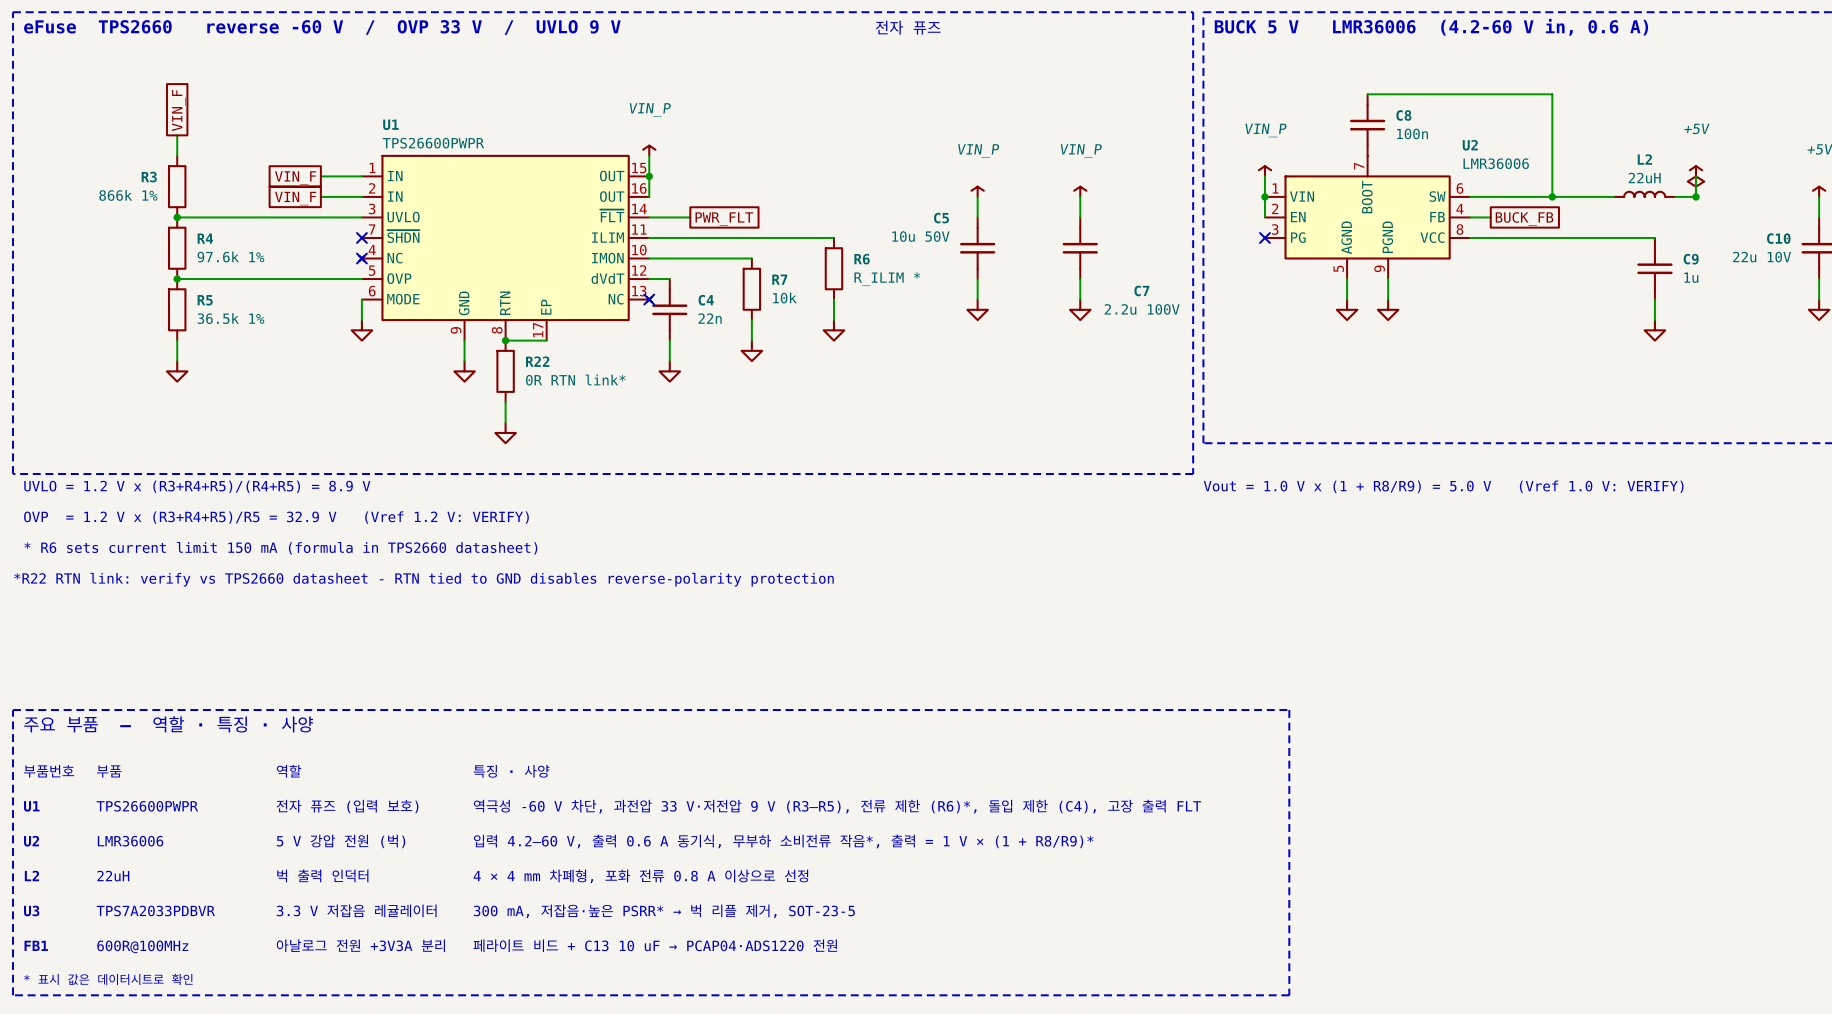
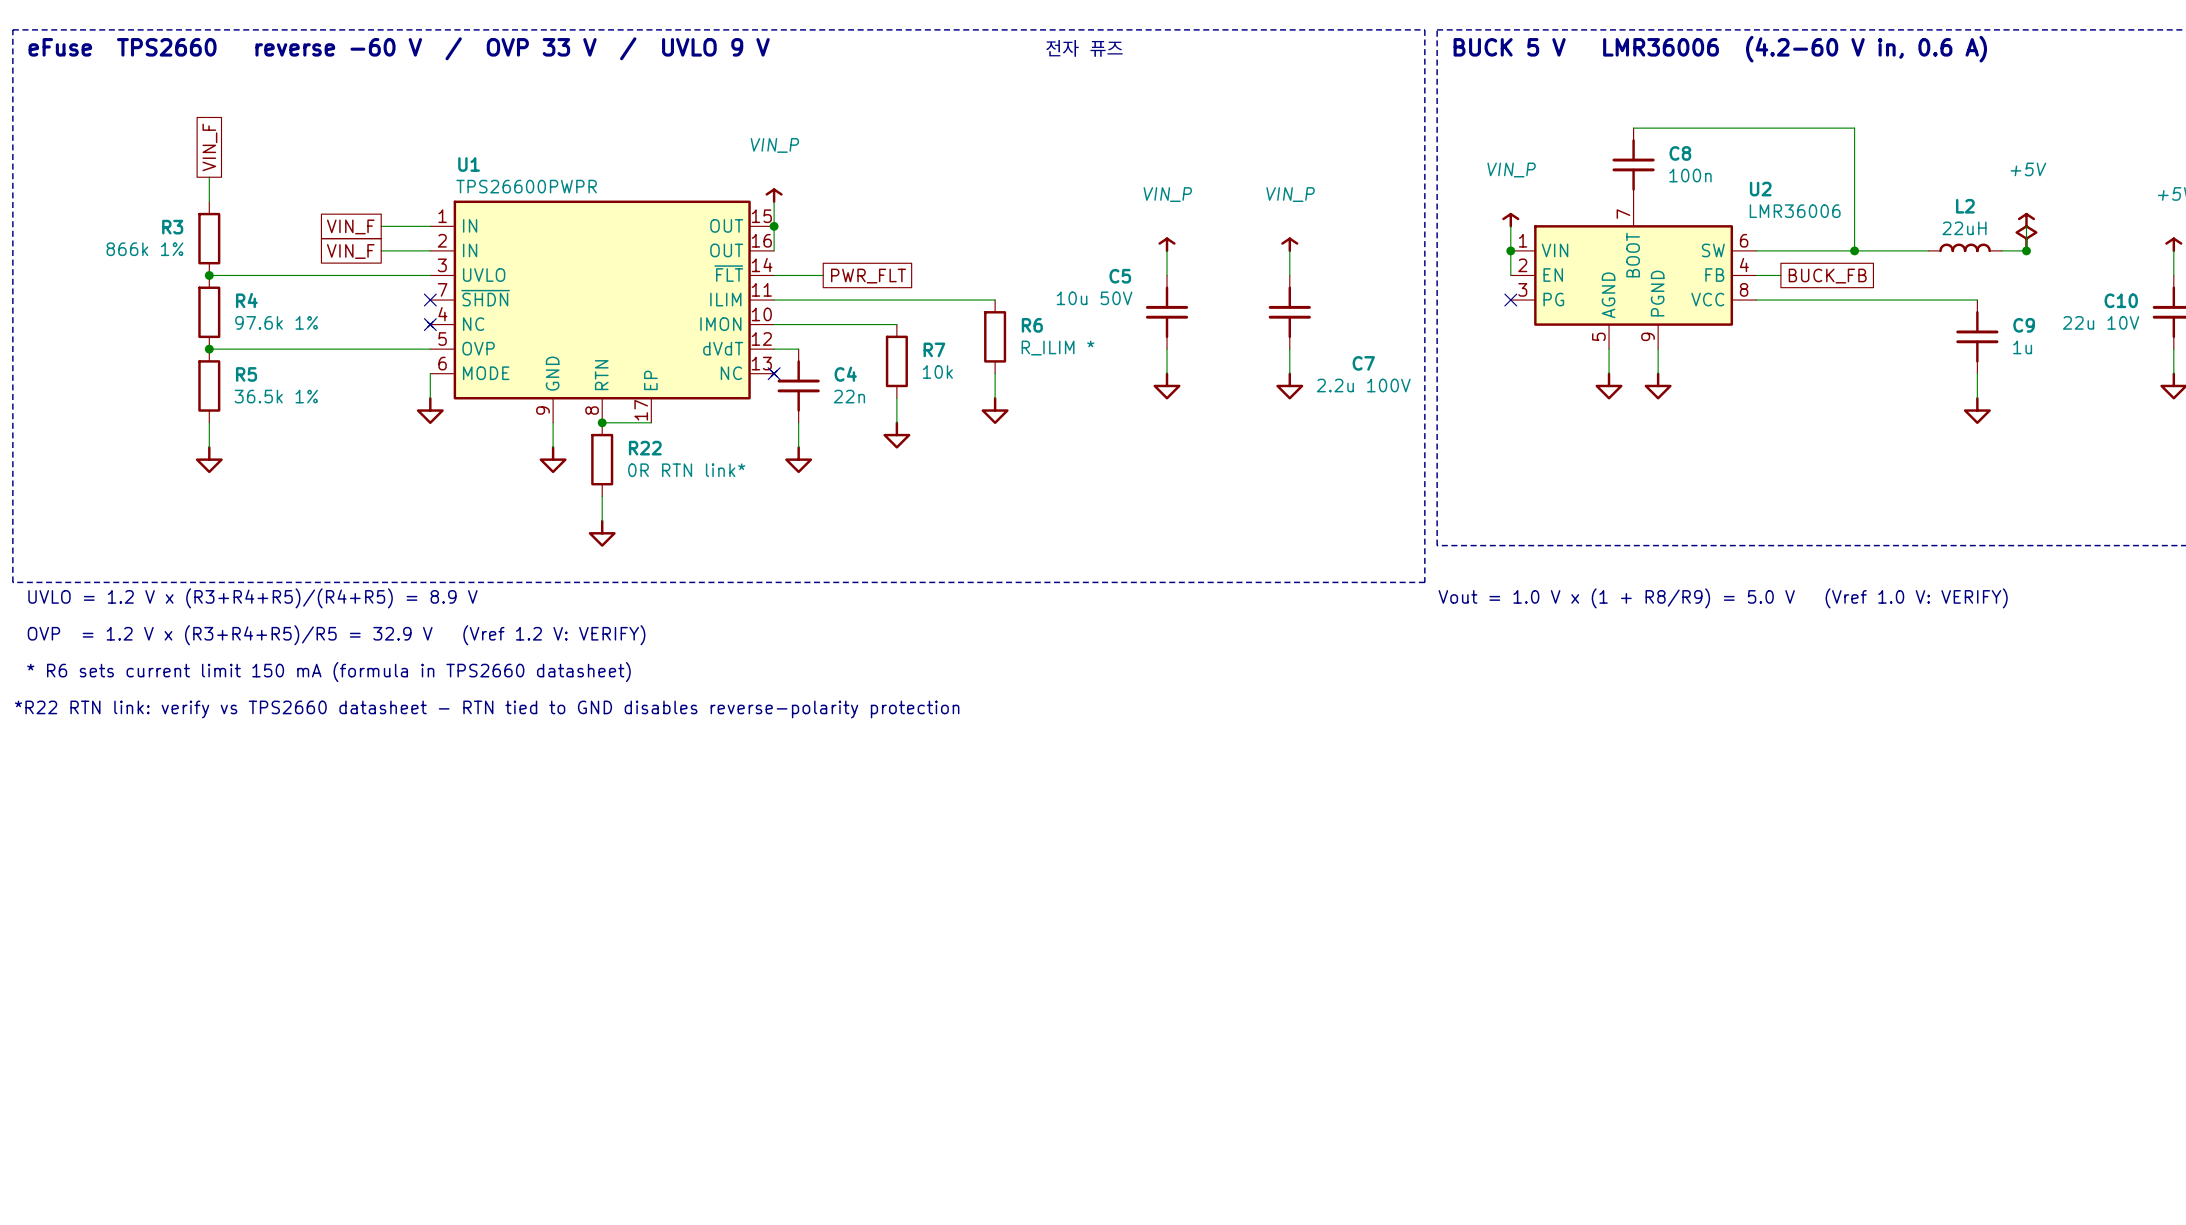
line: (13, 710) (1289, 710) (1289, 995) (13, 995) (13, 710) -> none
text: 주요 부품 — 역할 · 특징 · 사양 (168, 724) -> none
text: 부품번호 (49, 771) -> none
text: 부품 (109, 771) -> none
text: 역할 (289, 771) -> none
text: 특징 · 사양 (511, 771) -> none
text: U1 (31, 806) -> none
text: TPS26600PWPR (147, 806) -> none
text: 전자 퓨즈 (입력 보호) (347, 806) -> none
text: 역극성 -60 V 차단, 과전압 33 V·저전압 9 V (R3–R5), 전류 제한 (R6)*, 돌입 제한 (C4), 고장 출력 FLT (837, 806) -> none
text: U2 (31, 841) -> none
text: LMR36006 (130, 841) -> none
text: 5 V 강압 전원 (벅) (341, 841) -> none
text: 입력 4.2–60 V, 출력 0.6 A 동기식, 무부하 소비전류 작음*, 출력 = 1 V × (1 + R8/R9)* (783, 841) -> none
text: L2 (31, 875) -> none
text: 벅 출력 인덕터 (322, 875) -> none
text: 22uH (113, 876) -> none
text: 4 × 4 mm 차폐형, 포화 전류 0.8 A 이상으로 선정 (640, 876) -> none
text: U3 (31, 910) -> none
text: TPS7A2033PDBVR (155, 910) -> none
text: 3.3 V 저잡음 레귤레이터 (356, 910) -> none
text: 300 mA, 저잡음·높은 PSRR* → 벅 리플 제거, SOT-23-5 (664, 911) -> none
text: FB1 (36, 945) -> none
text: 아날로그 전원 +3V3A 분리 (360, 945) -> none
text: 페라이트 비드 + C13 10 uF → PCAP04·ADS1220 전원 (655, 945) -> none
text: 600R@100MHz (142, 946) -> none
text: * 표시 값은 데이터시트로 확인 (108, 979) -> none

